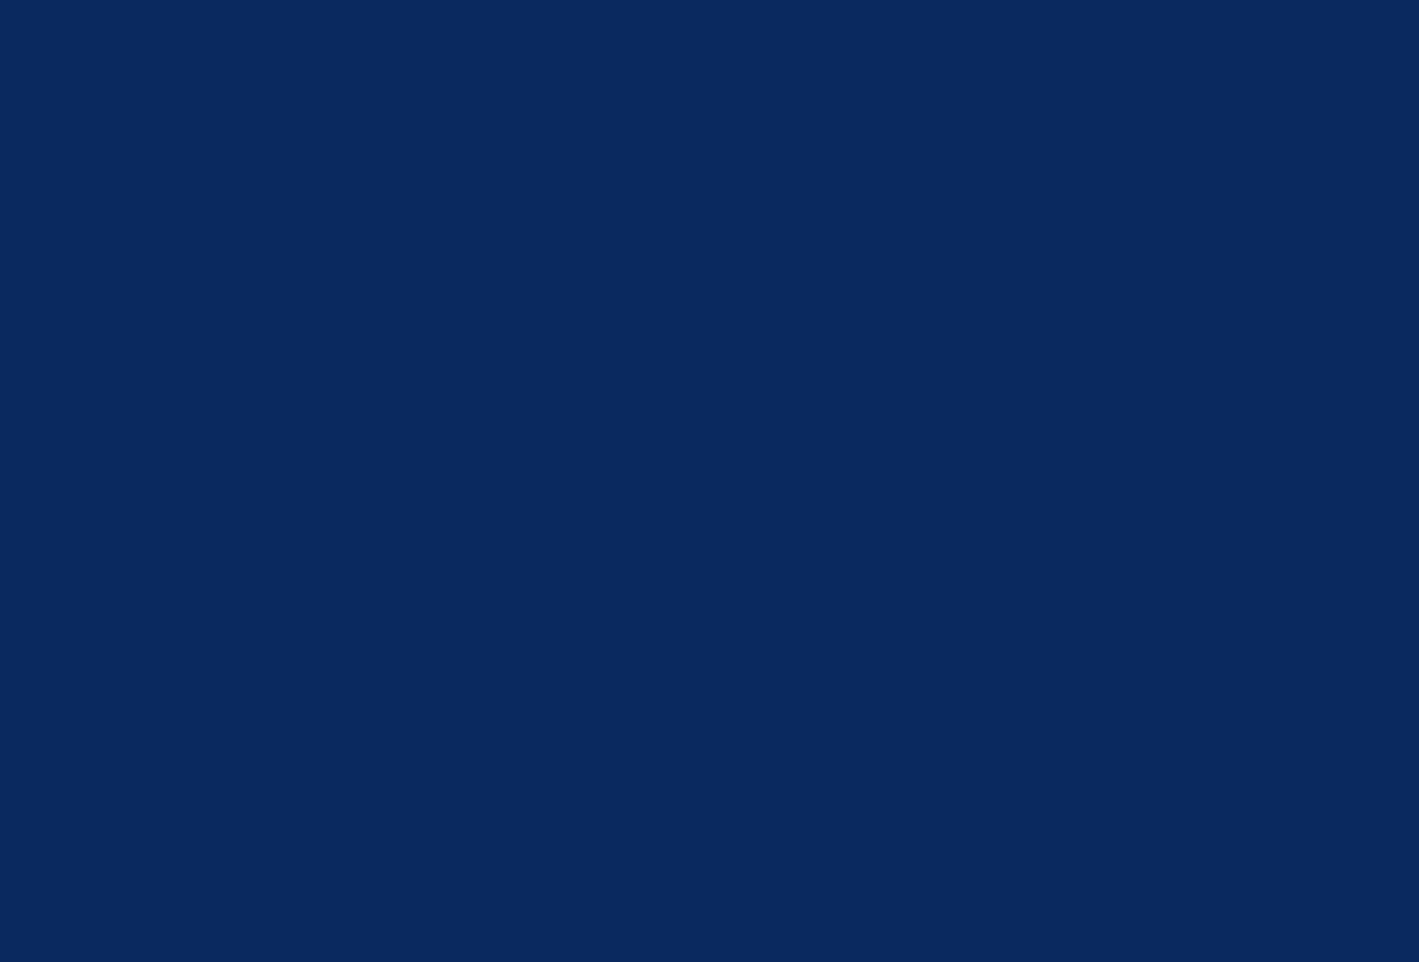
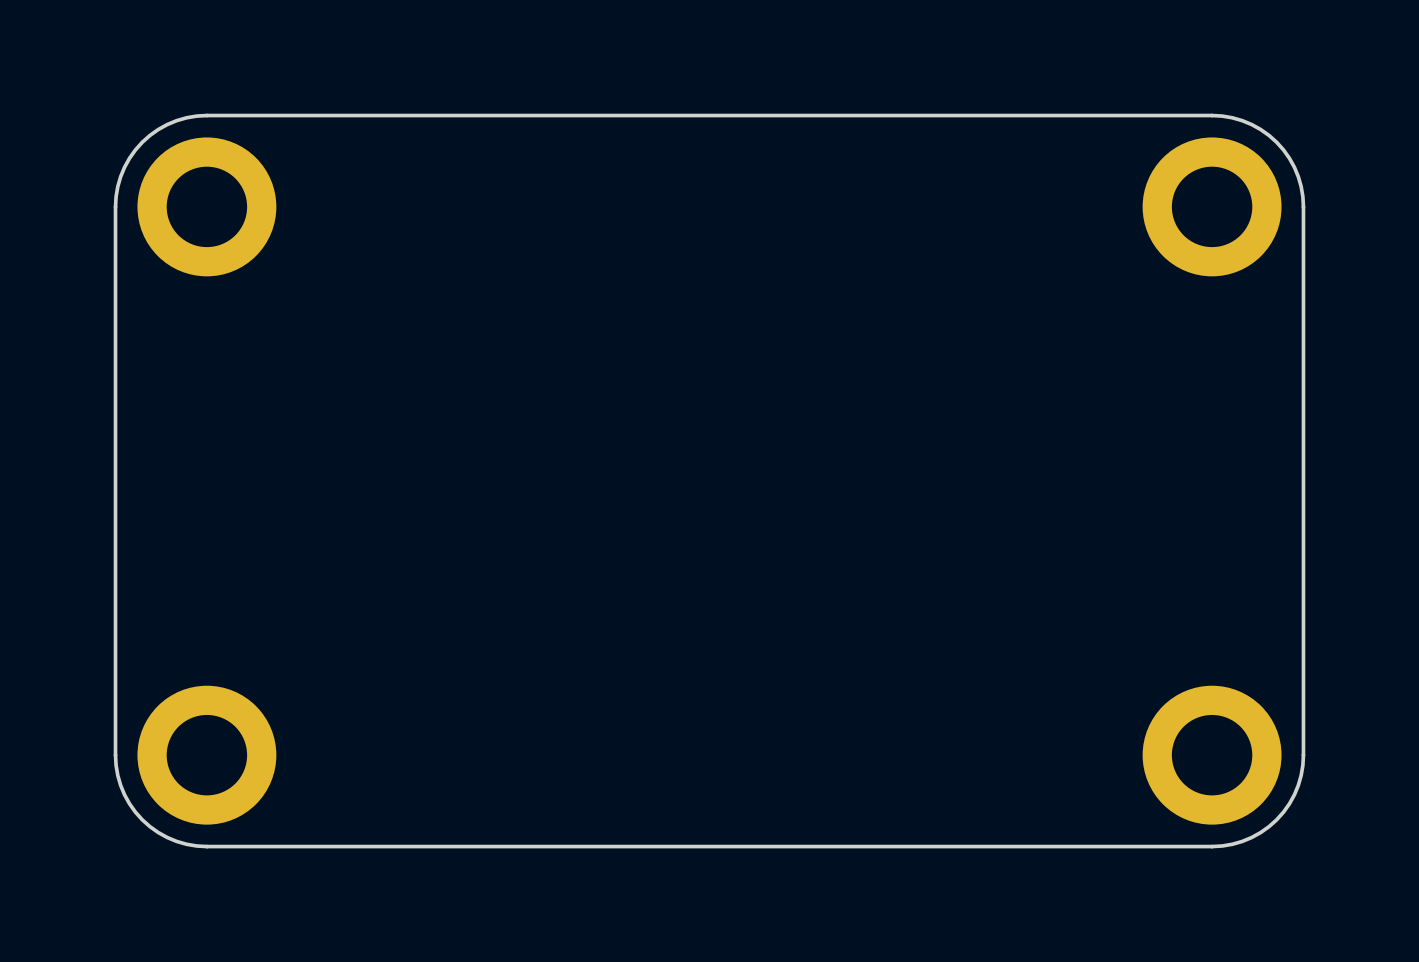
board edge: none -> (1212, 115) (206, 115) (176, 120) (158, 129) (142, 142) (129, 158) (120, 176) (115, 206) (115, 755) (120, 785) (129, 803) (142, 819) (158, 832) (176, 841) (206, 846) (1212, 846) (1242, 841) (1260, 832) (1276, 819) (1289, 803) (1298, 785) (1302, 765) (1302, 196) (1294, 167) (1276, 142) (1260, 129) (1242, 120) (1212, 115)
part: none -> (206, 206)
part: none -> (1212, 206)
part: none -> (206, 755)
part: none -> (1212, 755)

